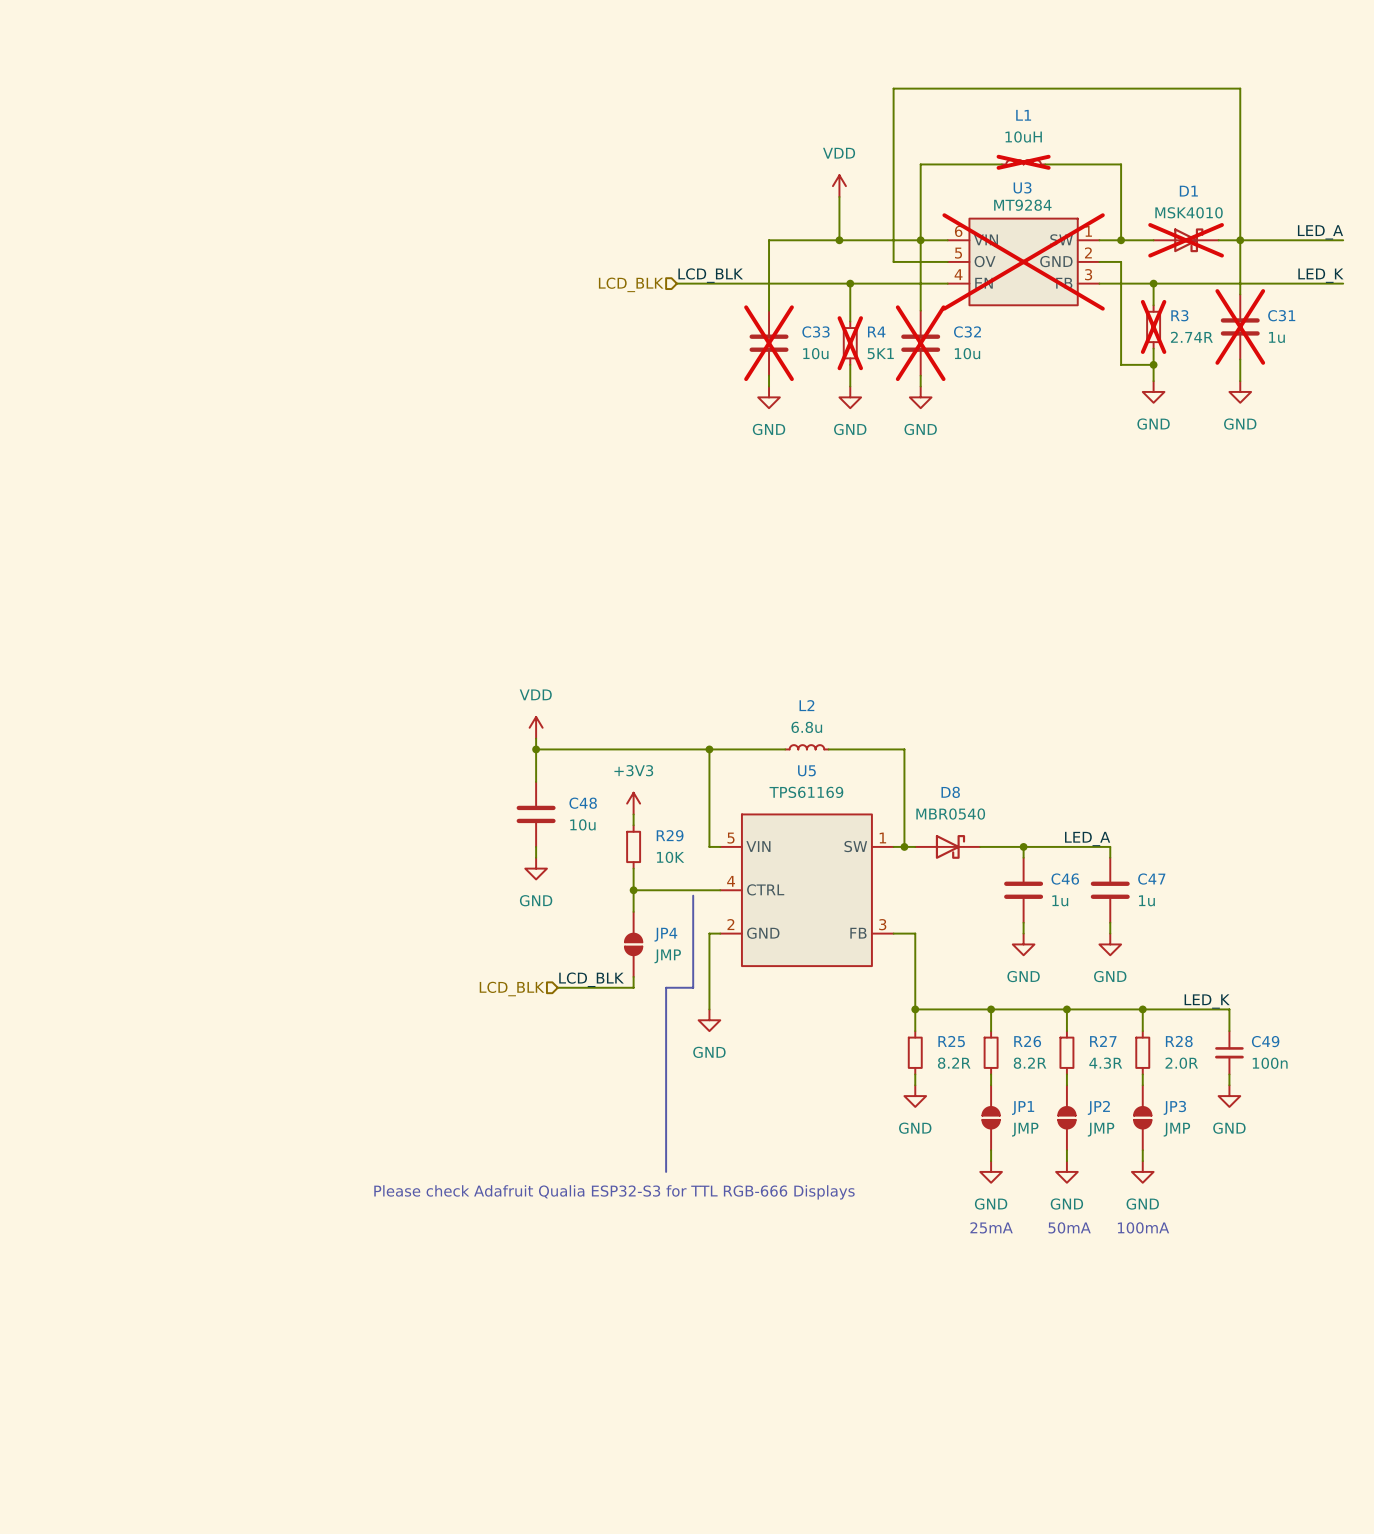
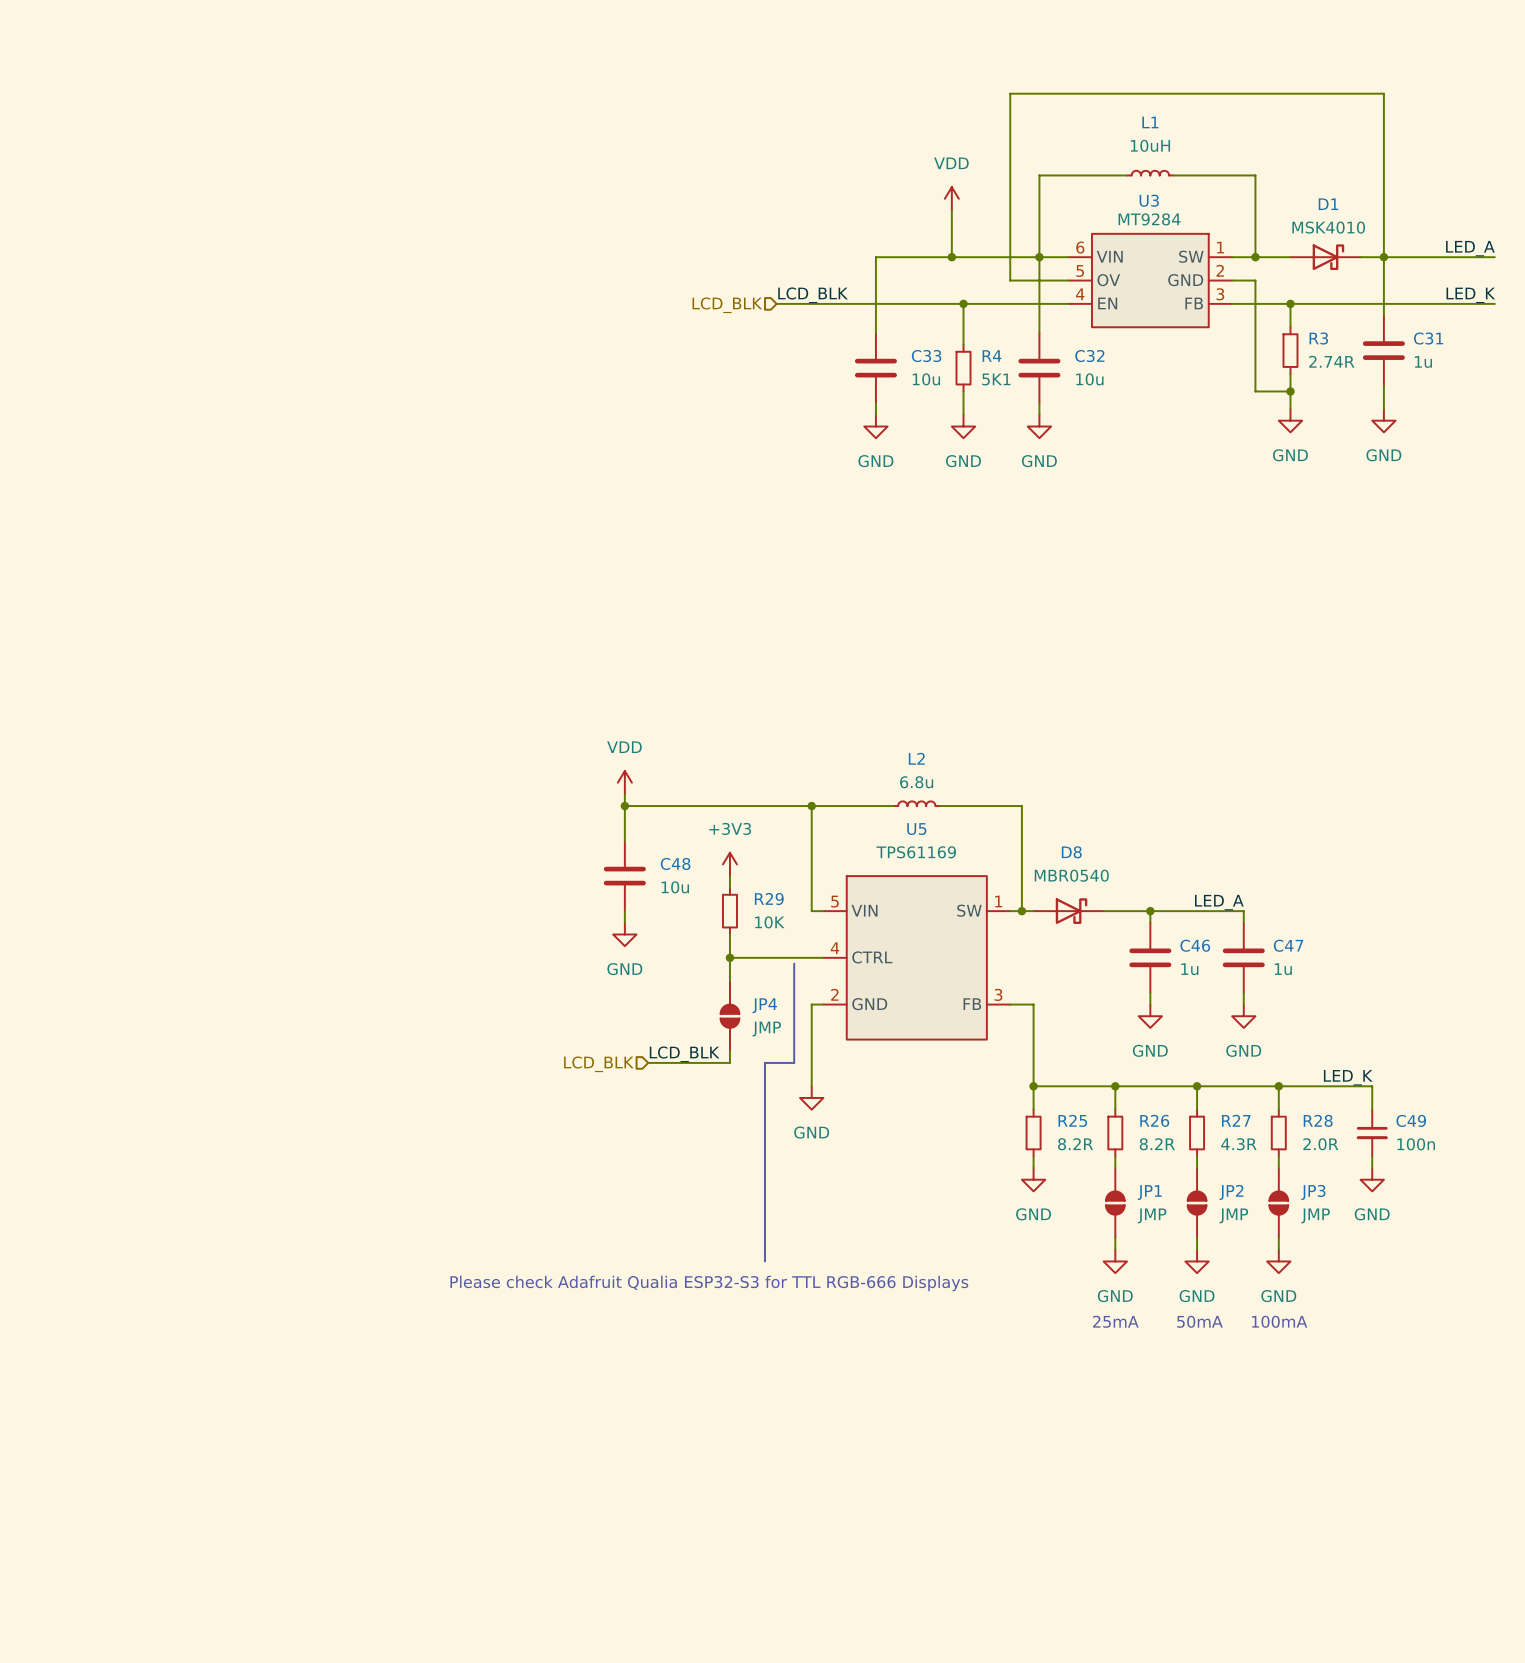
L1 do-not-place cross: (1023, 162) -> none
D1 do-not-place cross: (1186, 240) -> none
U3 do-not-place cross: (1023, 261) -> none
R3 do-not-place cross: (1153, 326) -> none
C31 do-not-place cross: (1240, 326) -> none
C33 do-not-place cross: (769, 343) -> none
R4 do-not-place cross: (850, 343) -> none
C32 do-not-place cross: (920, 343) -> none

